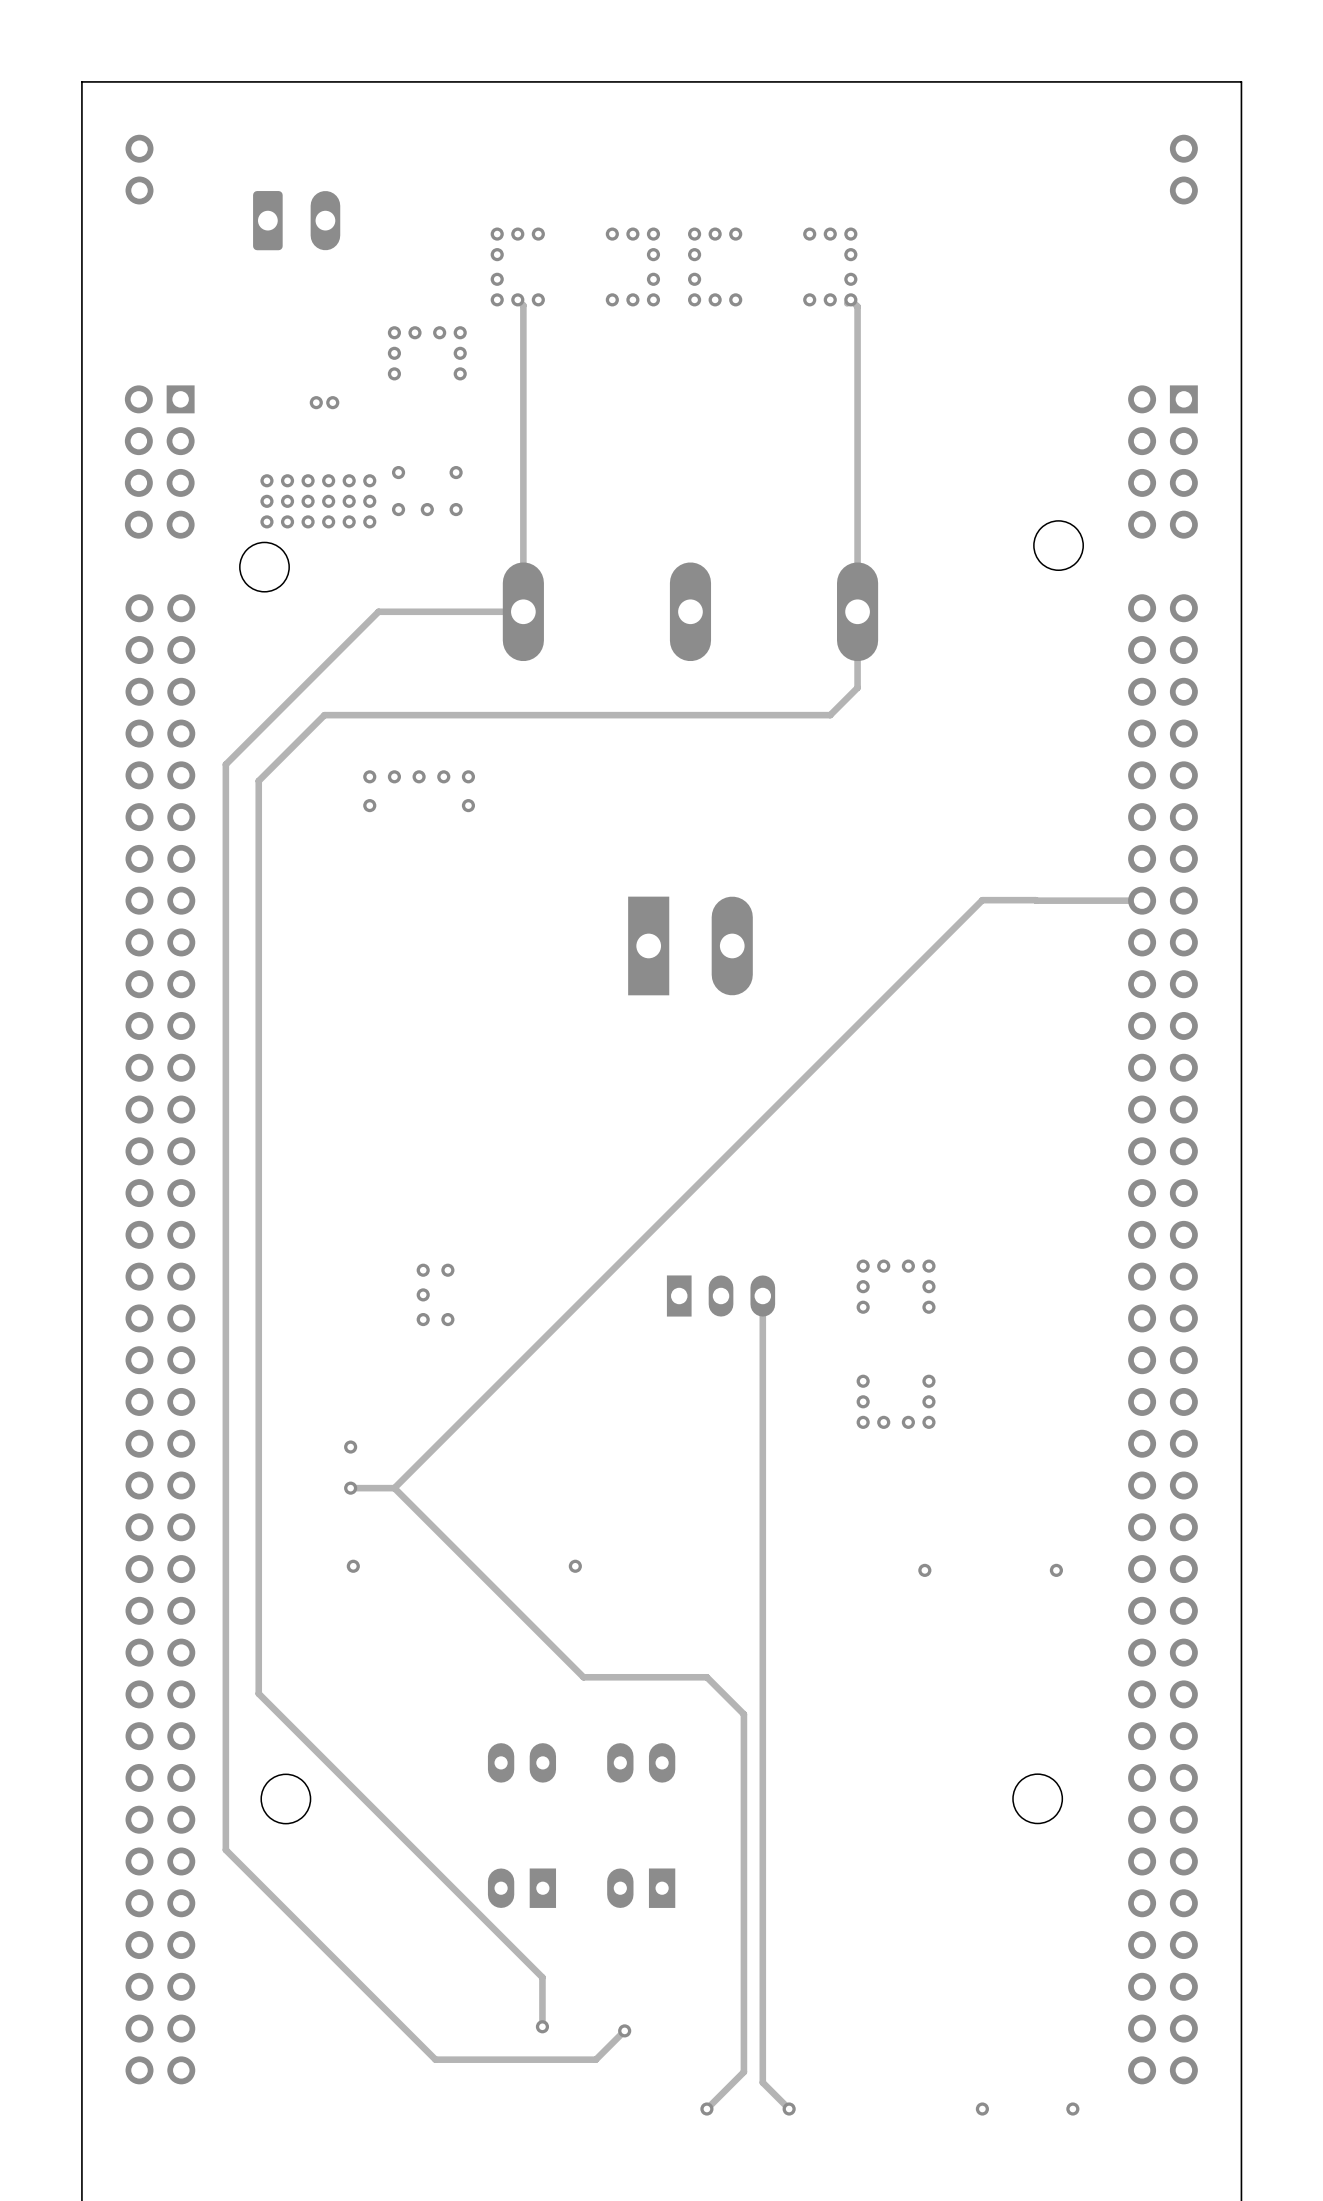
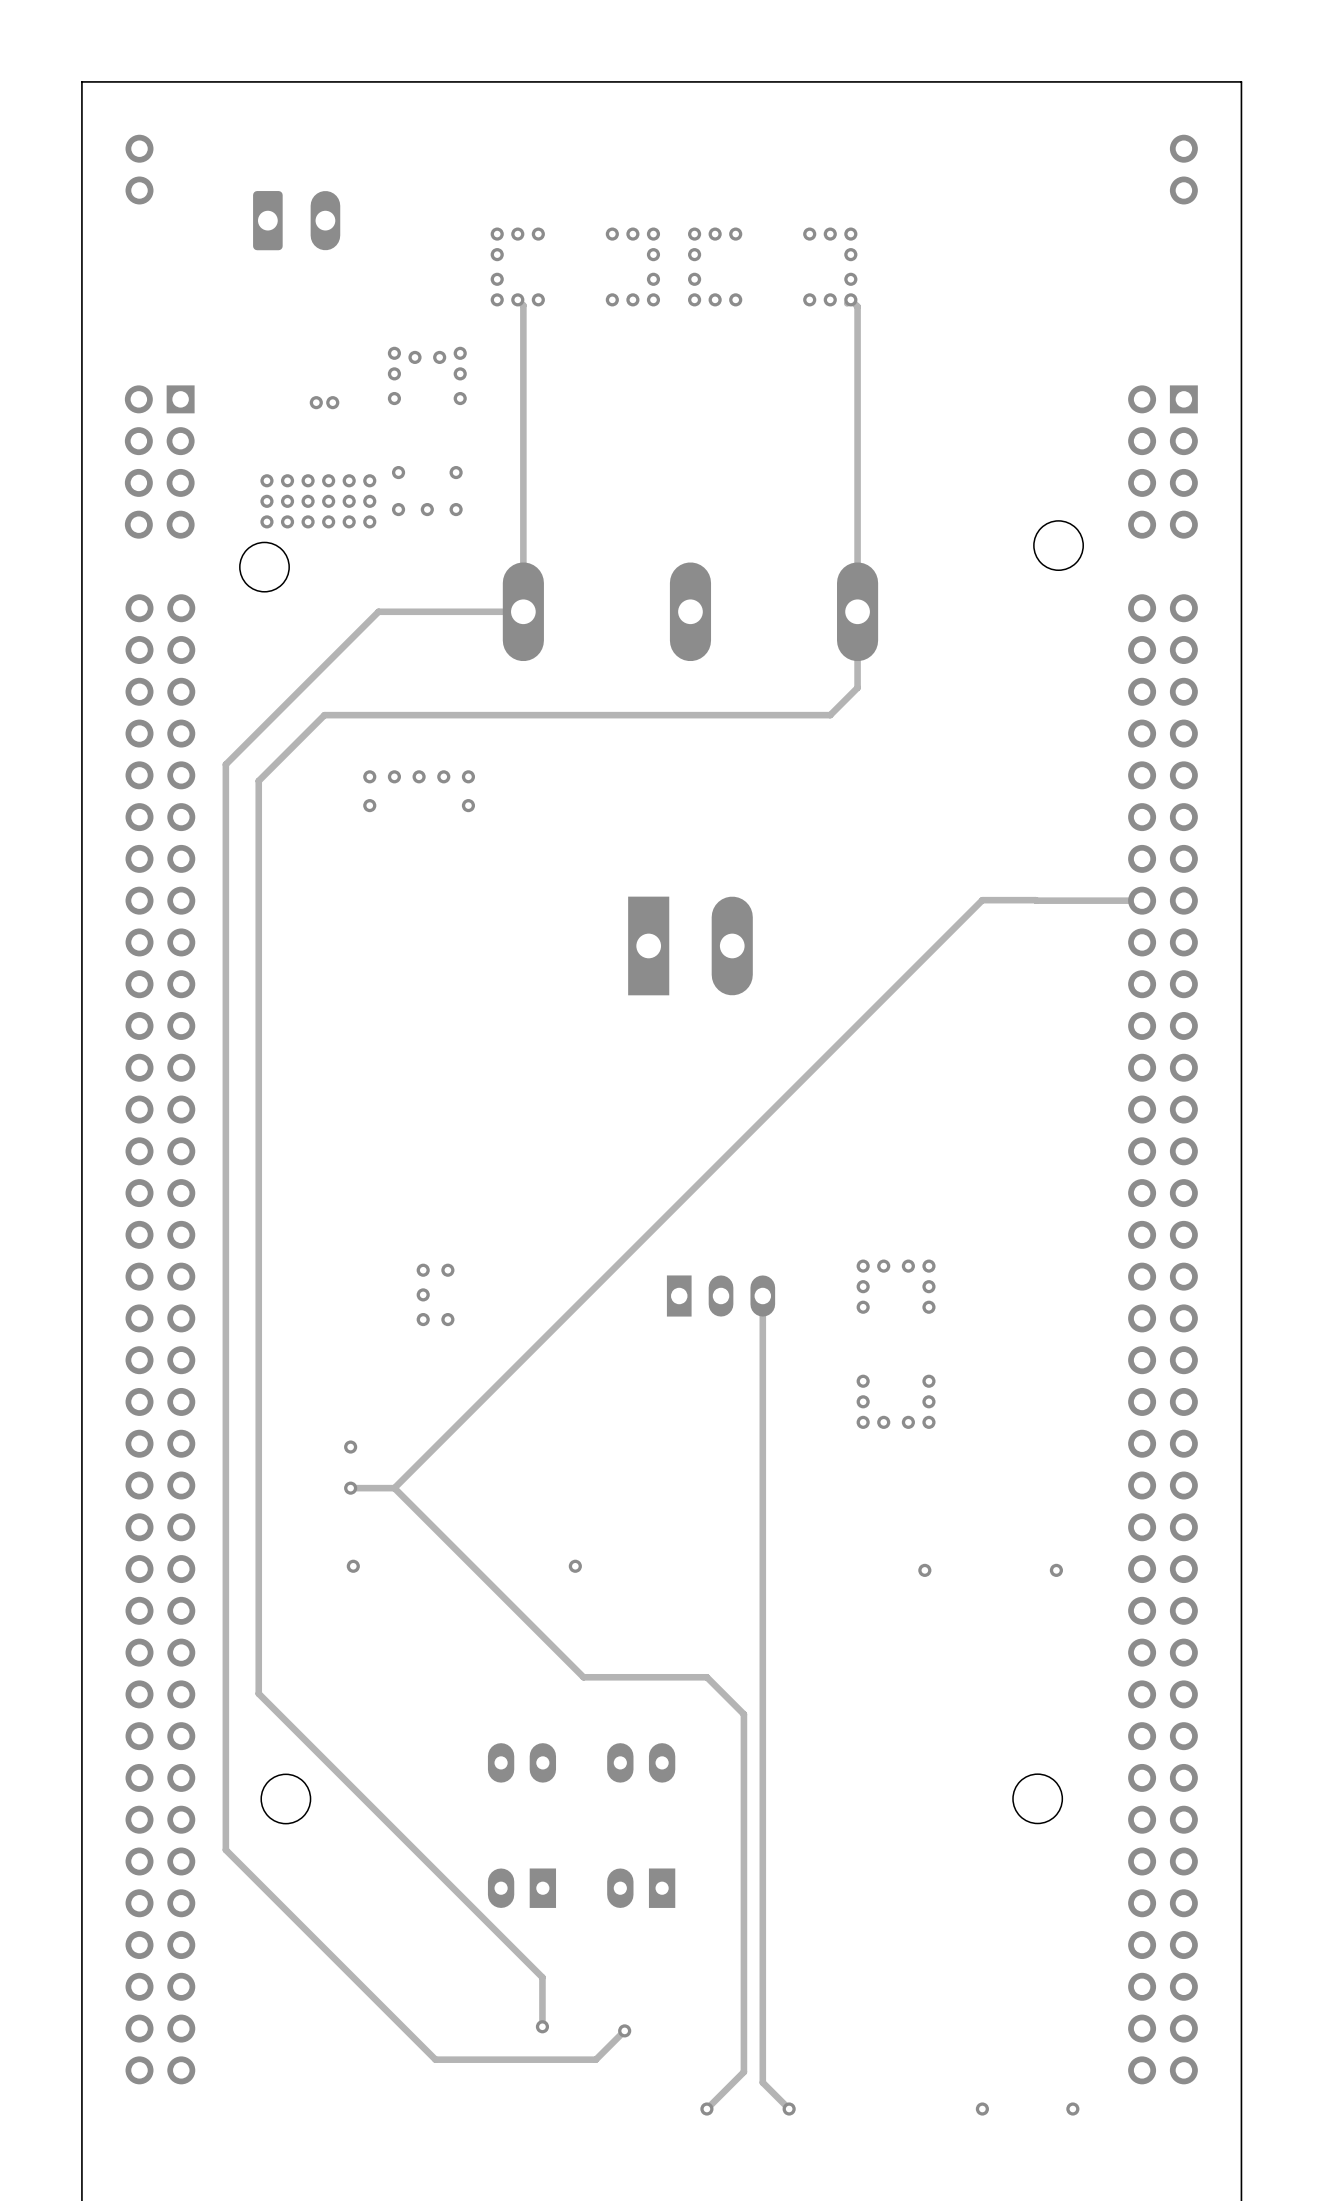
via: (394, 332) -> none
via: (414, 332) -> none
via: (439, 332) -> none
via: (460, 332) -> none
via: none -> (414, 357)
via: none -> (439, 357)
via: none -> (394, 398)
via: none -> (460, 398)

